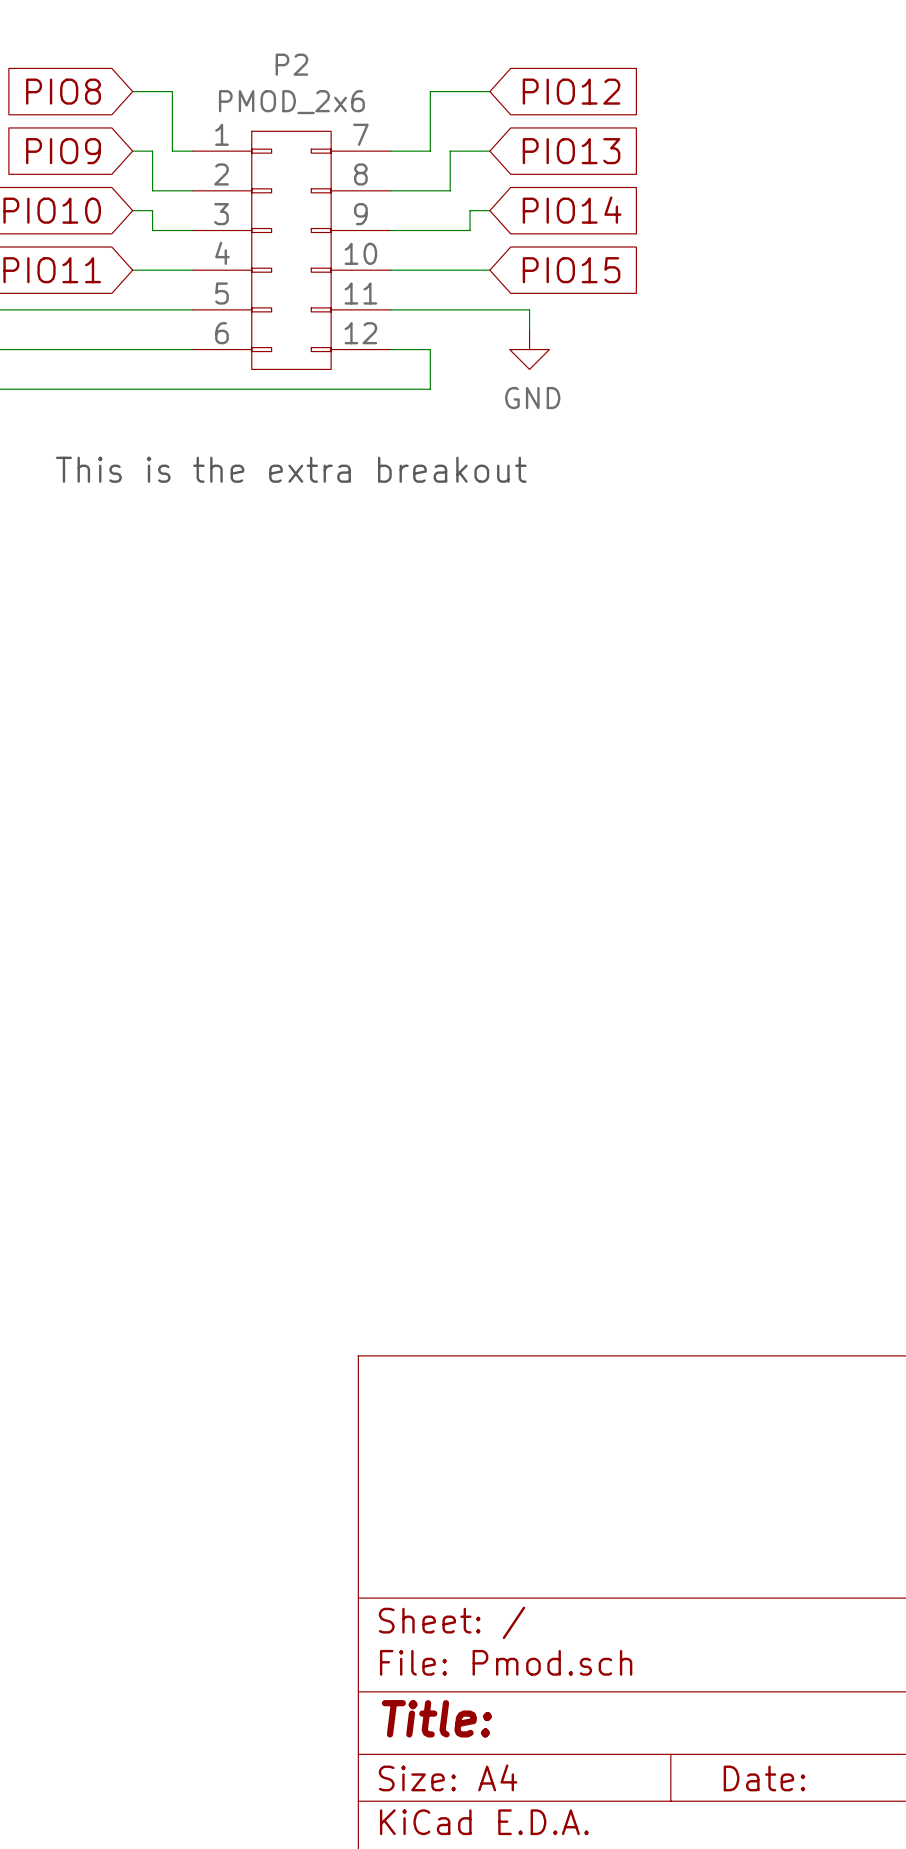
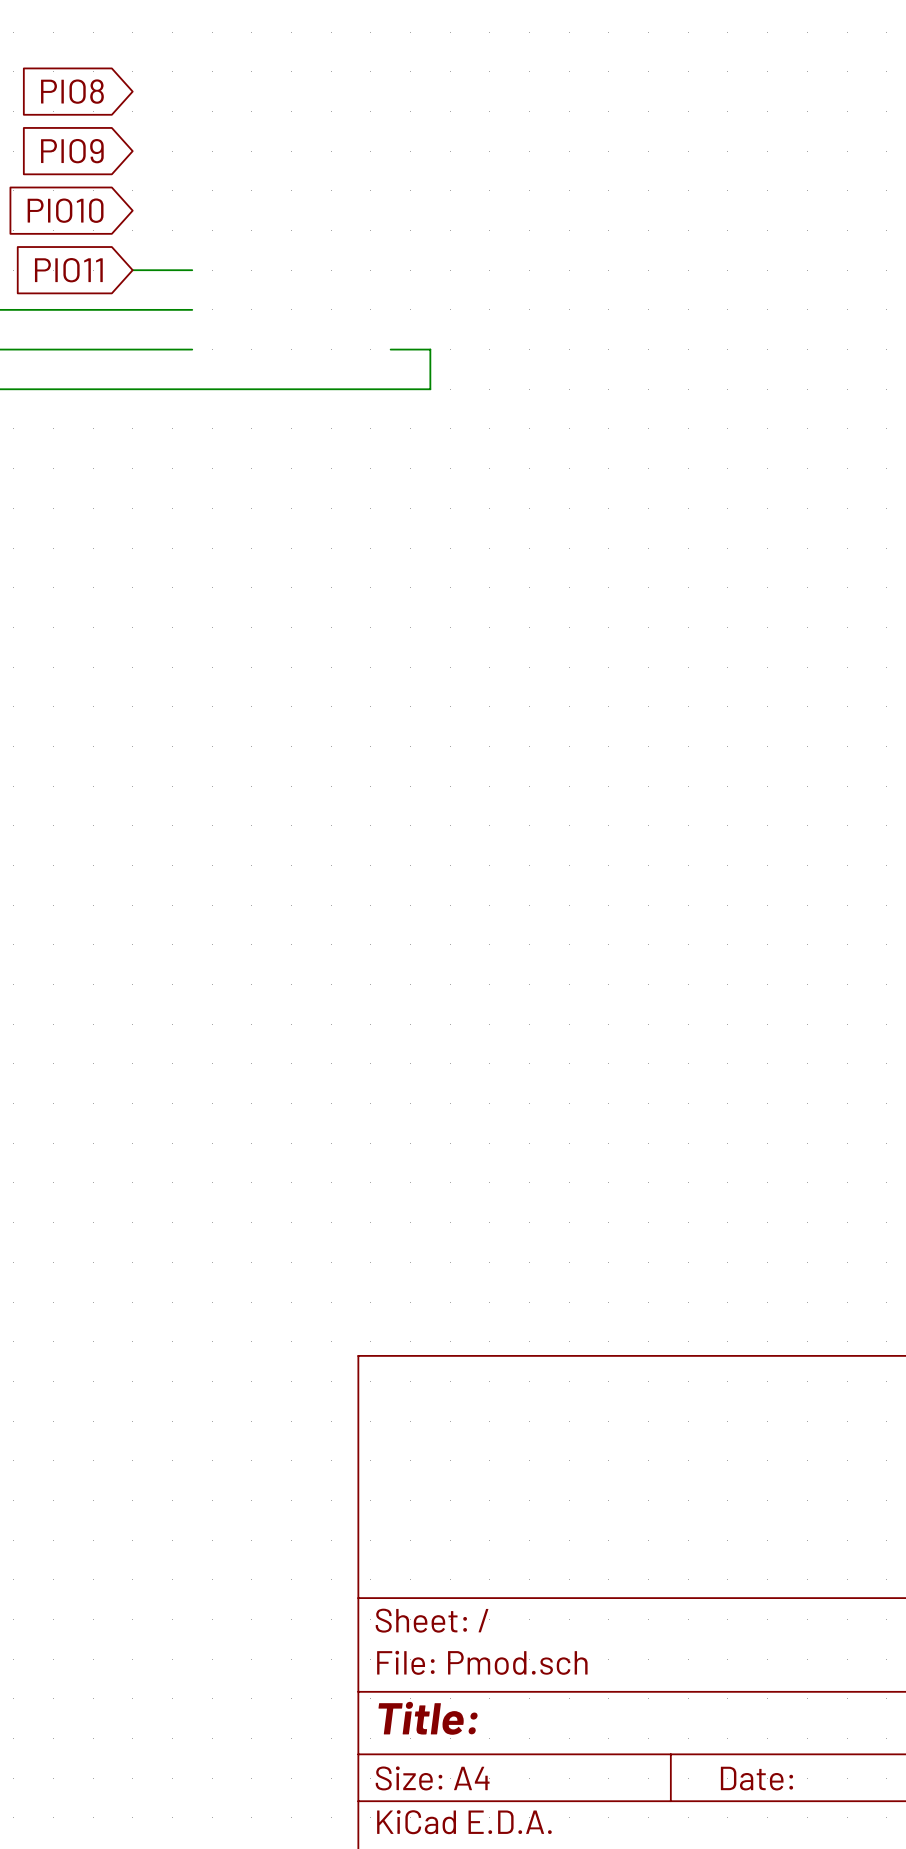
wire: (132, 91) (172, 91) (172, 151) (192, 151) -> none
wire: (489, 91) (430, 91) (430, 151) (390, 151) -> none
global label: PIO12 (571, 91) -> none
wire: (132, 151) (152, 151) (152, 190) (192, 190) -> none
wire: (489, 151) (450, 151) (450, 190) (390, 190) -> none
global label: PIO13 (571, 151) -> none
wire: (132, 210) (152, 210) (152, 230) (192, 230) -> none
wire: (489, 210) (470, 210) (470, 230) (390, 230) -> none
global label: PIO14 (572, 210) -> none
P2: PMOD_2x6 (291, 250) -> none
wire: (390, 270) (489, 270) -> none
global label: PIO15 (571, 270) -> none
wire: (390, 309) (529, 309) (529, 329) -> none
power symbol: GND (529, 349) -> none
text: This is the extra breakout (291, 469) -> none

